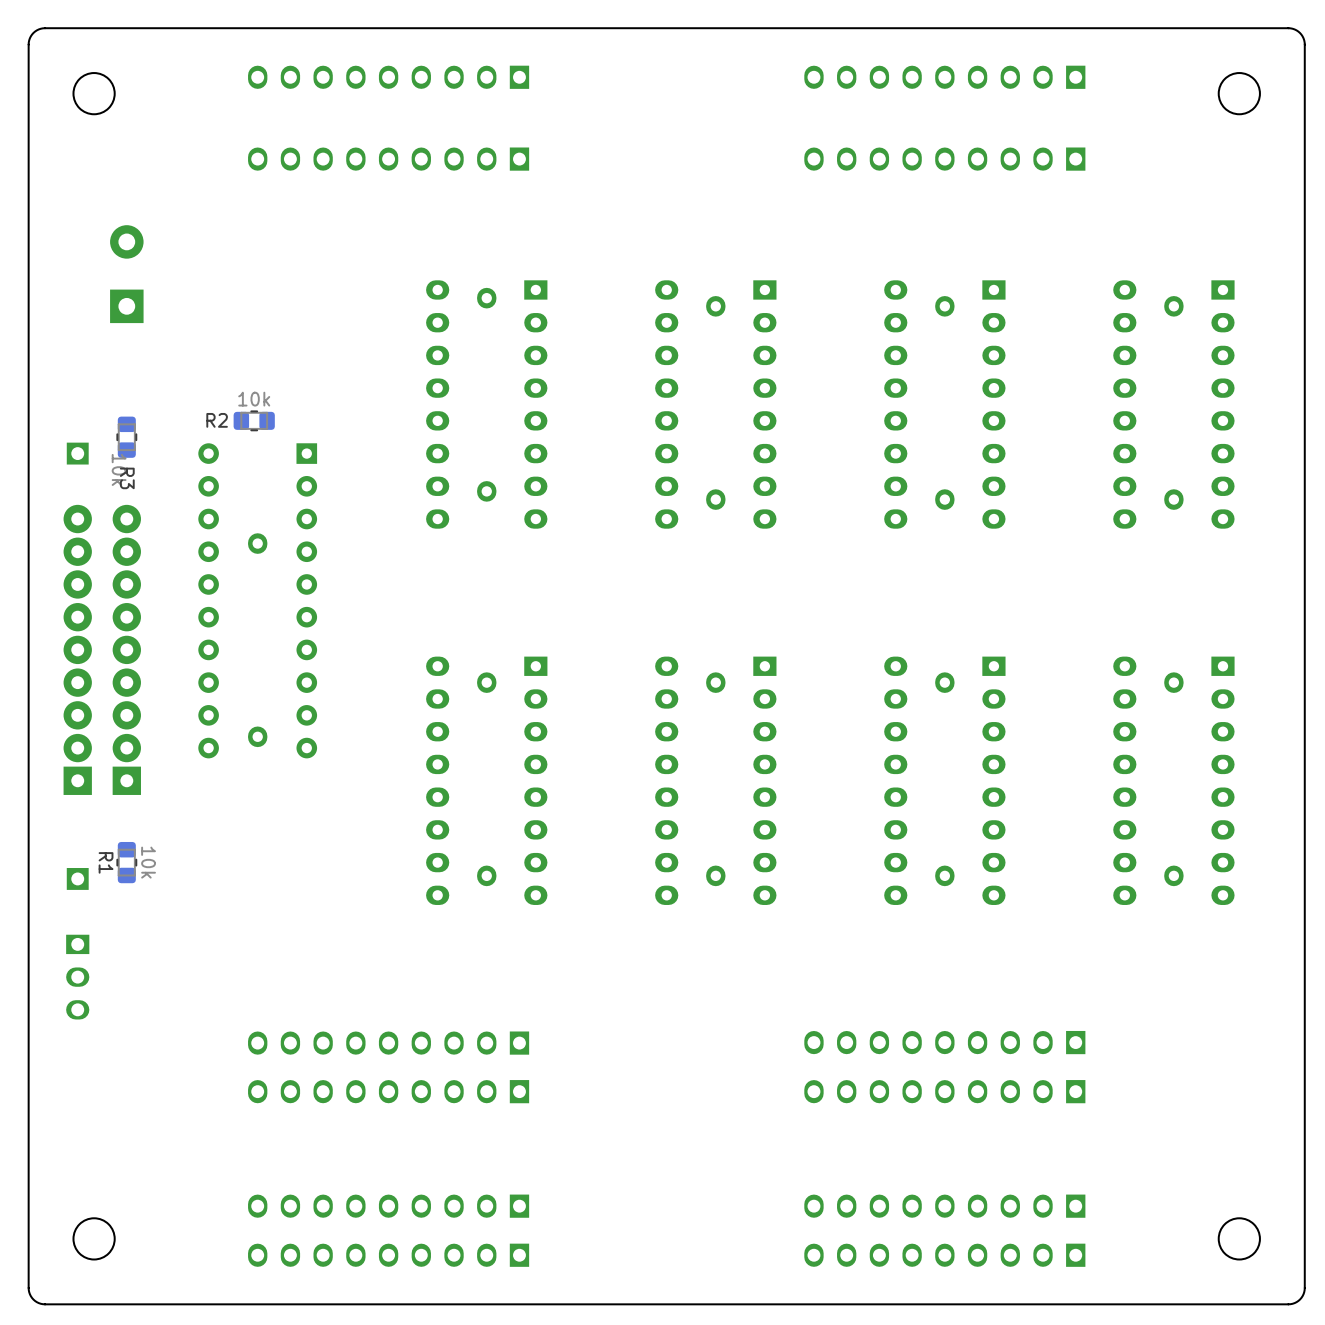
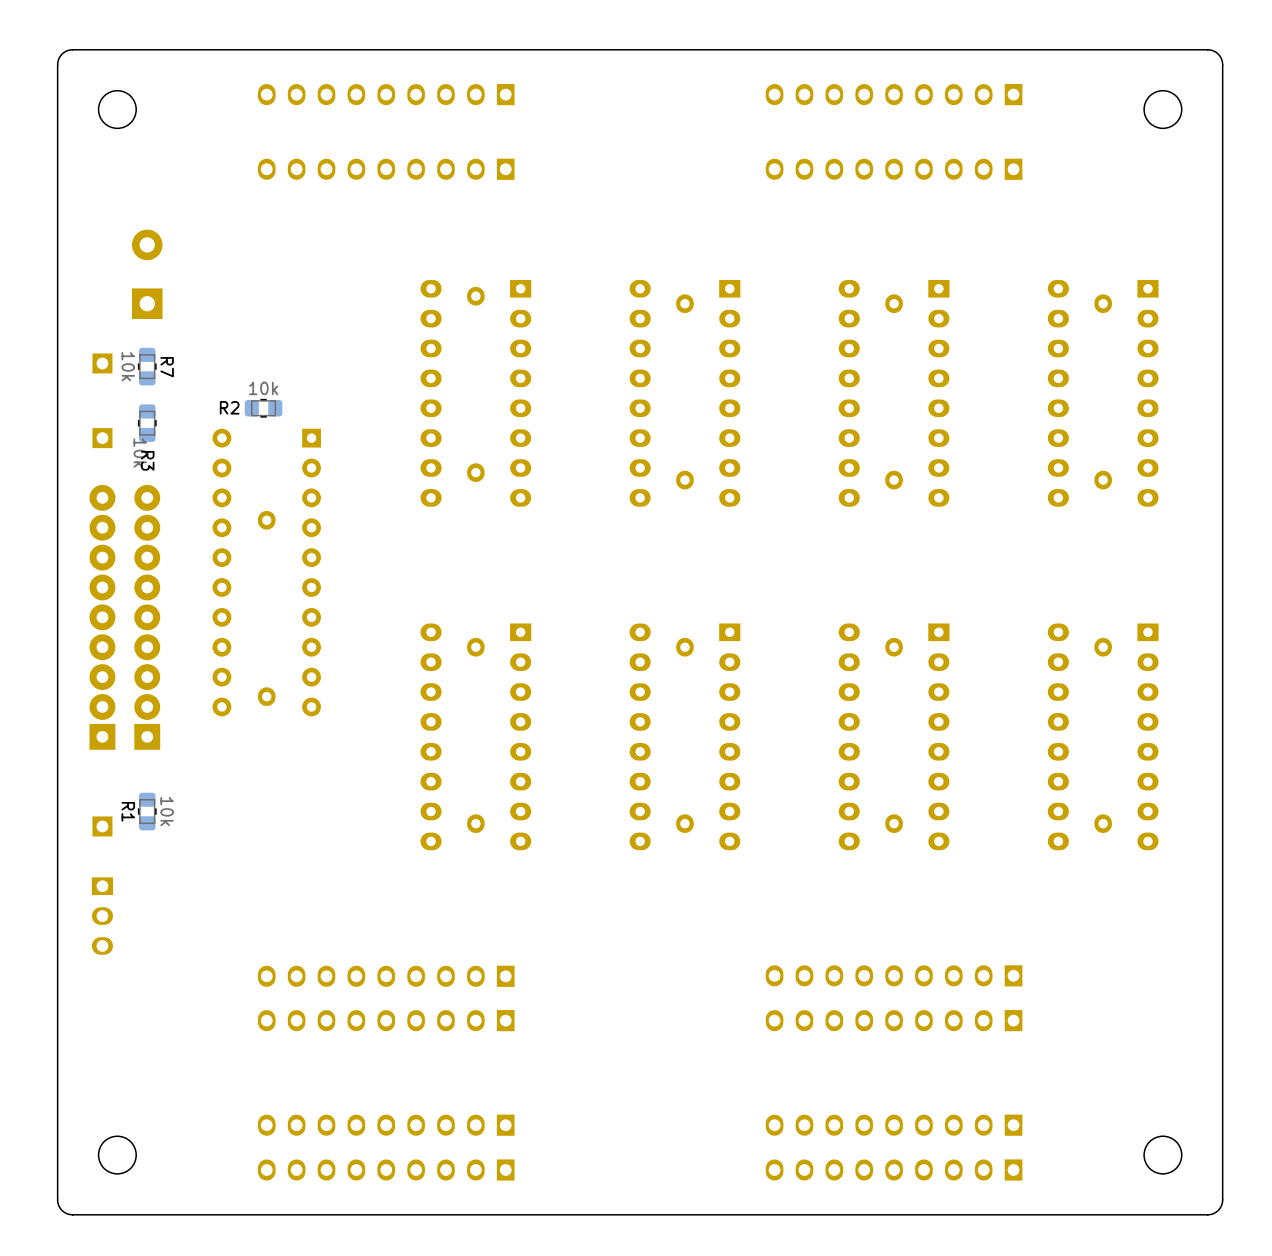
part: none -> (102, 363)
R7: none -> 10k (147, 366)

